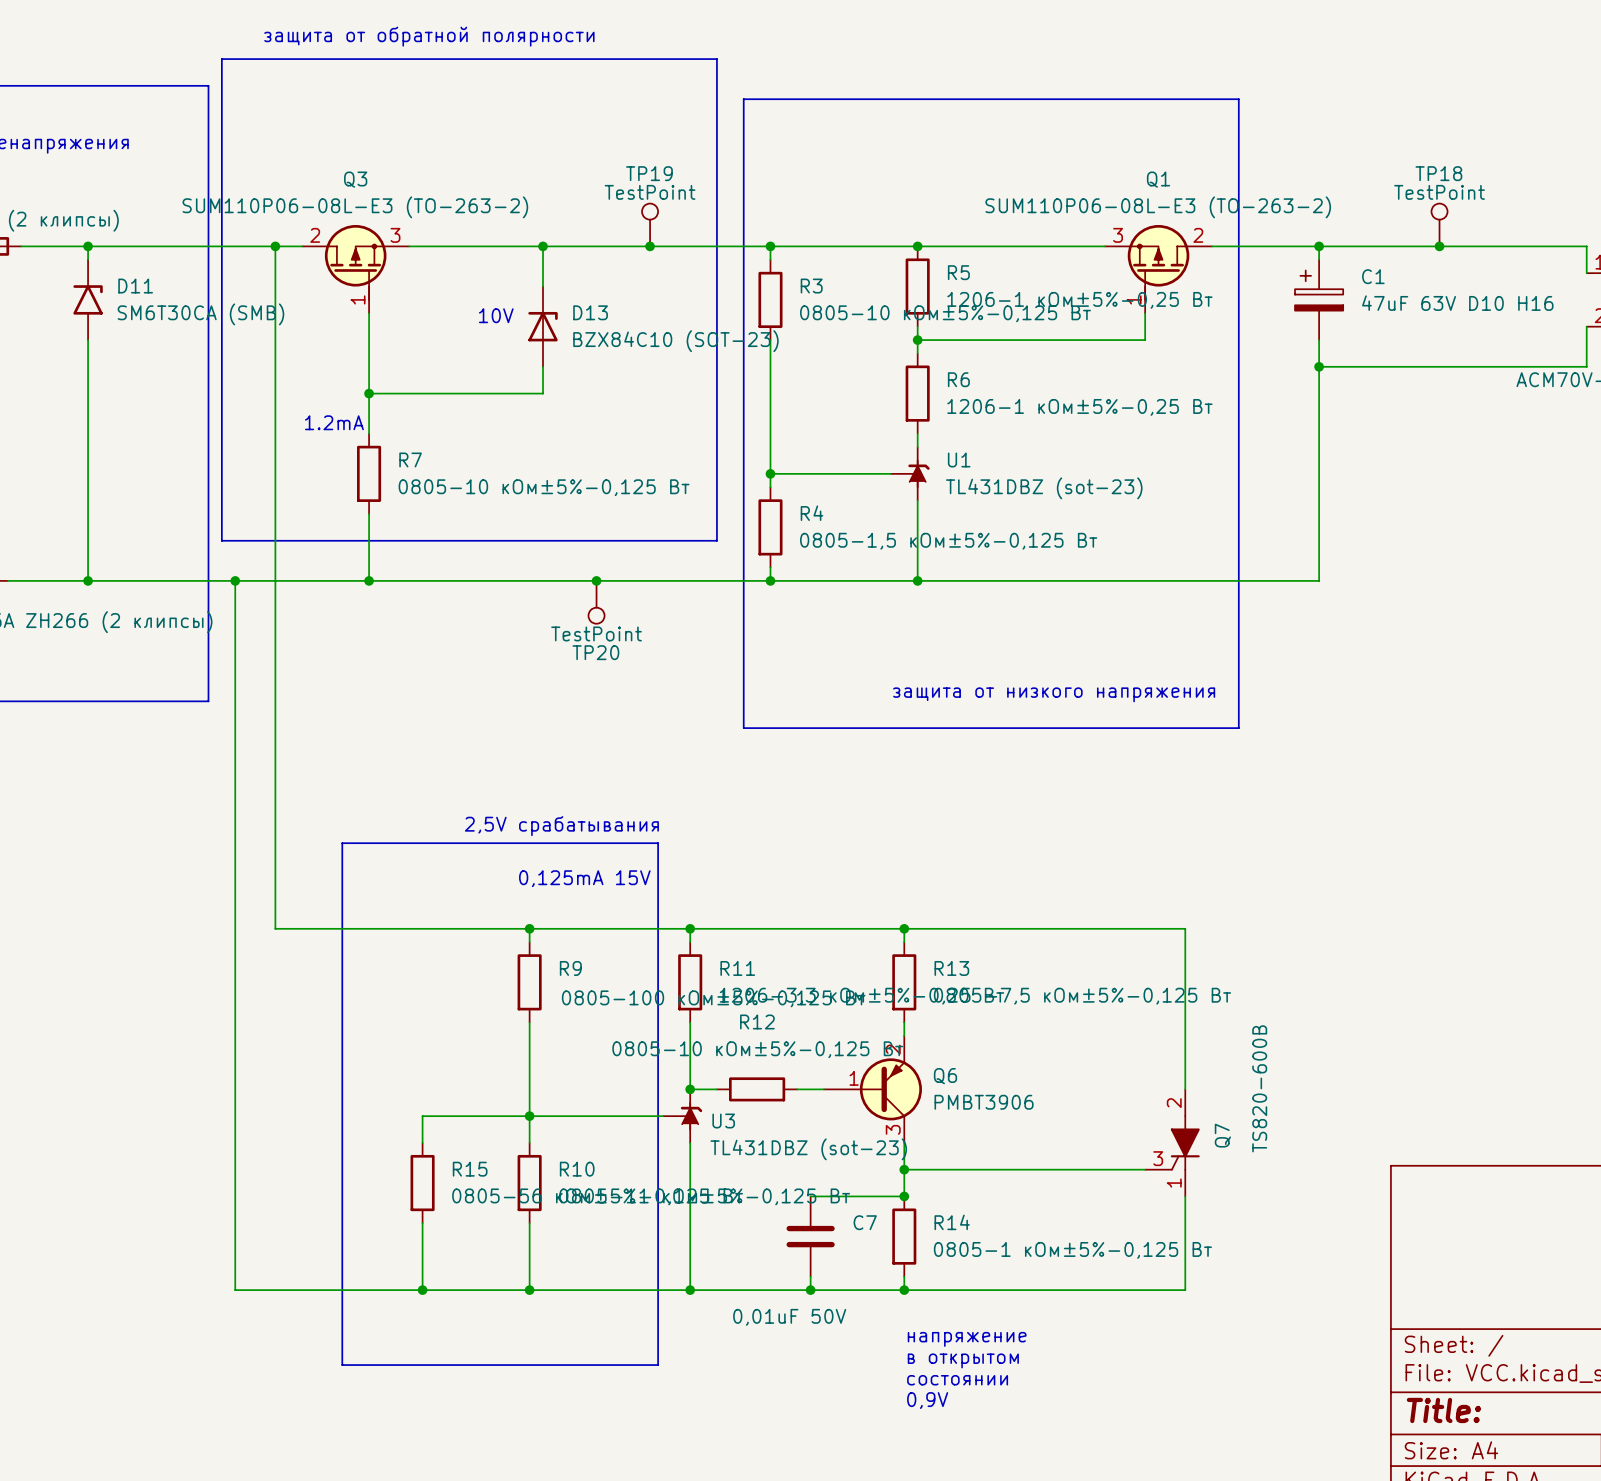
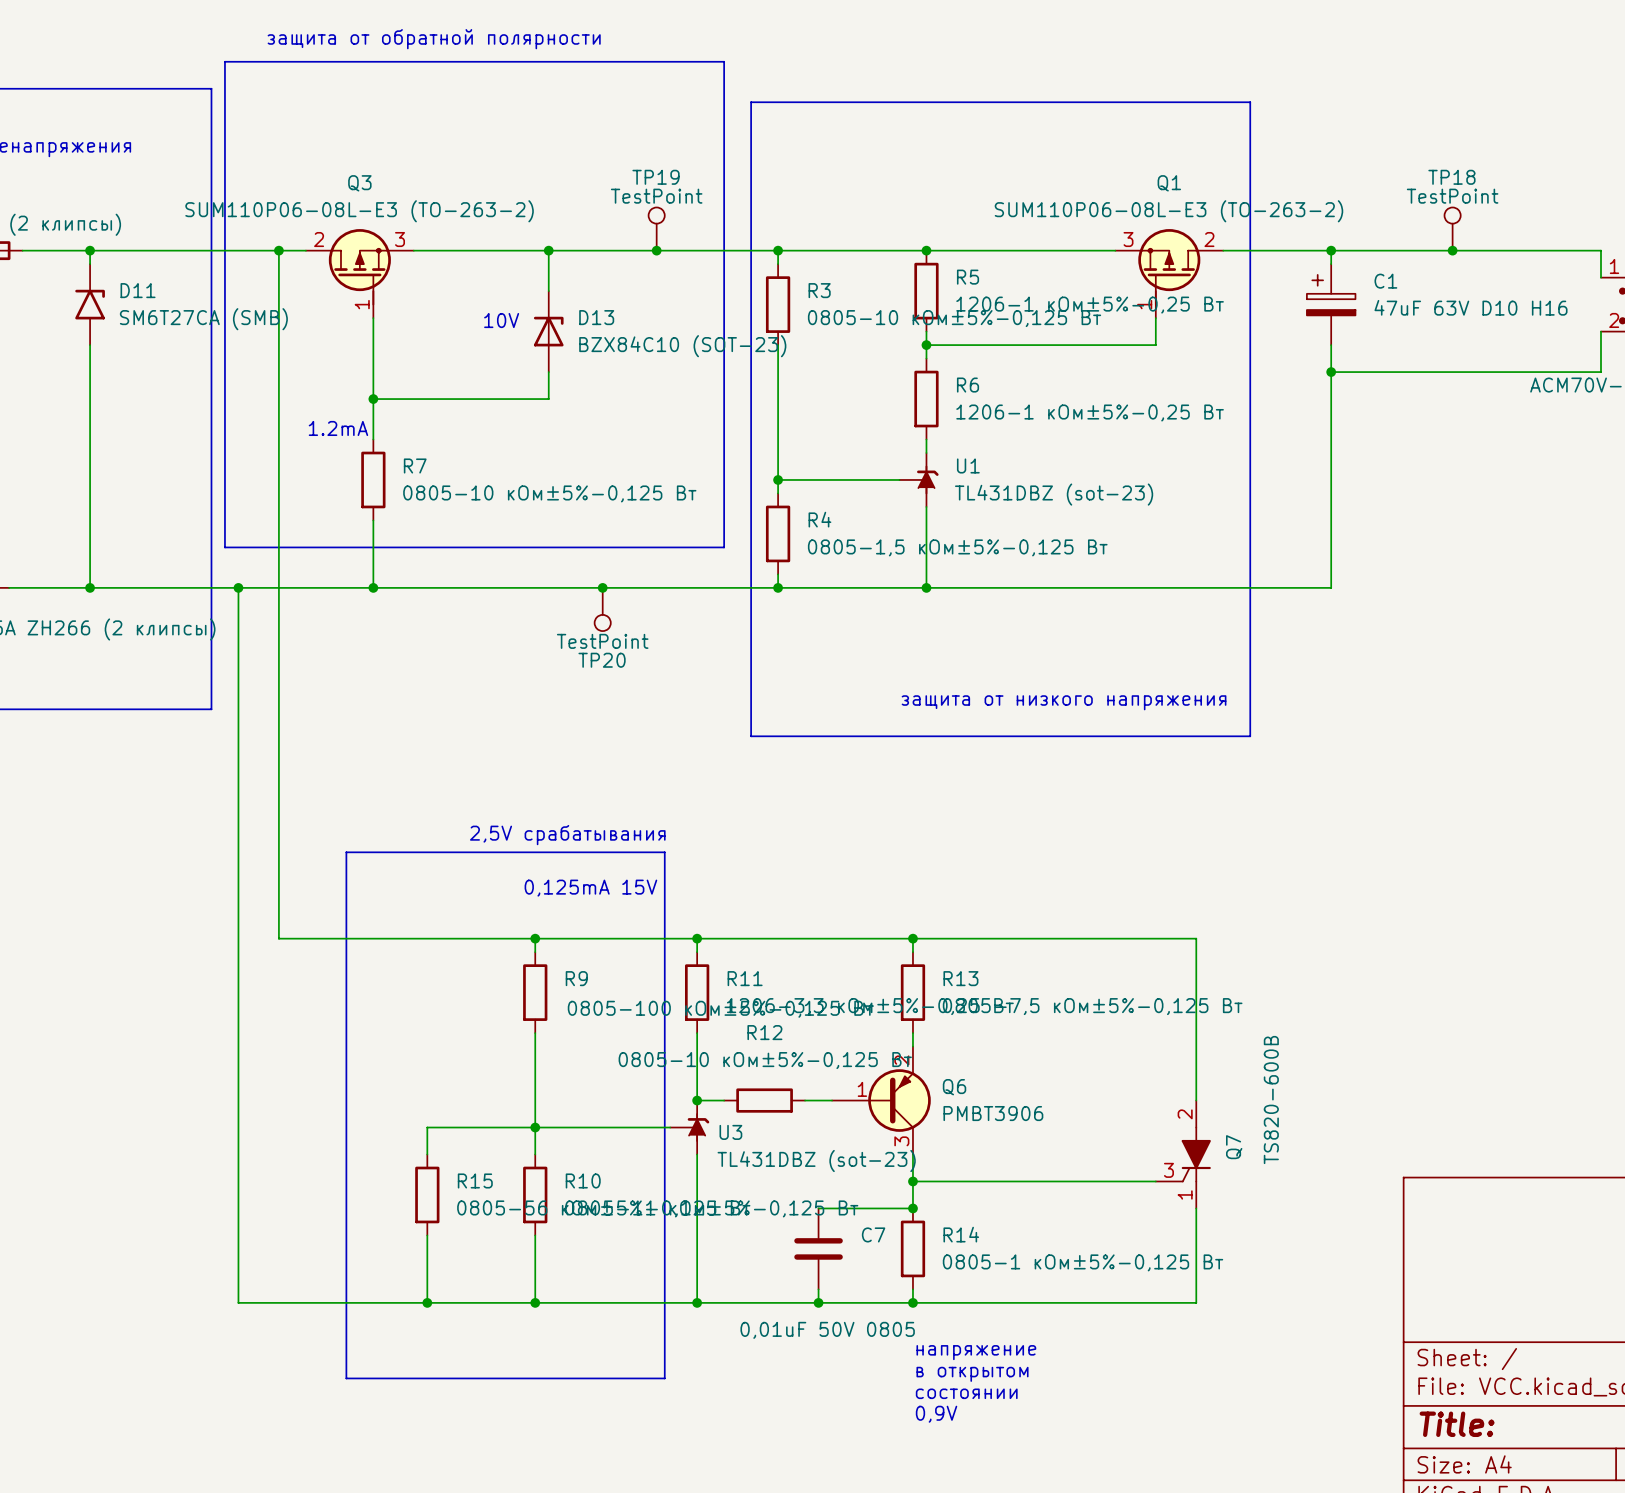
D11 value: SM6T30CA (SMB) (200, 314) -> SM6T27CA (SMB) (203, 319)
C7 value: 0,01uF 50V (789, 1317) -> 0,01uF 50V 0805 (827, 1330)

